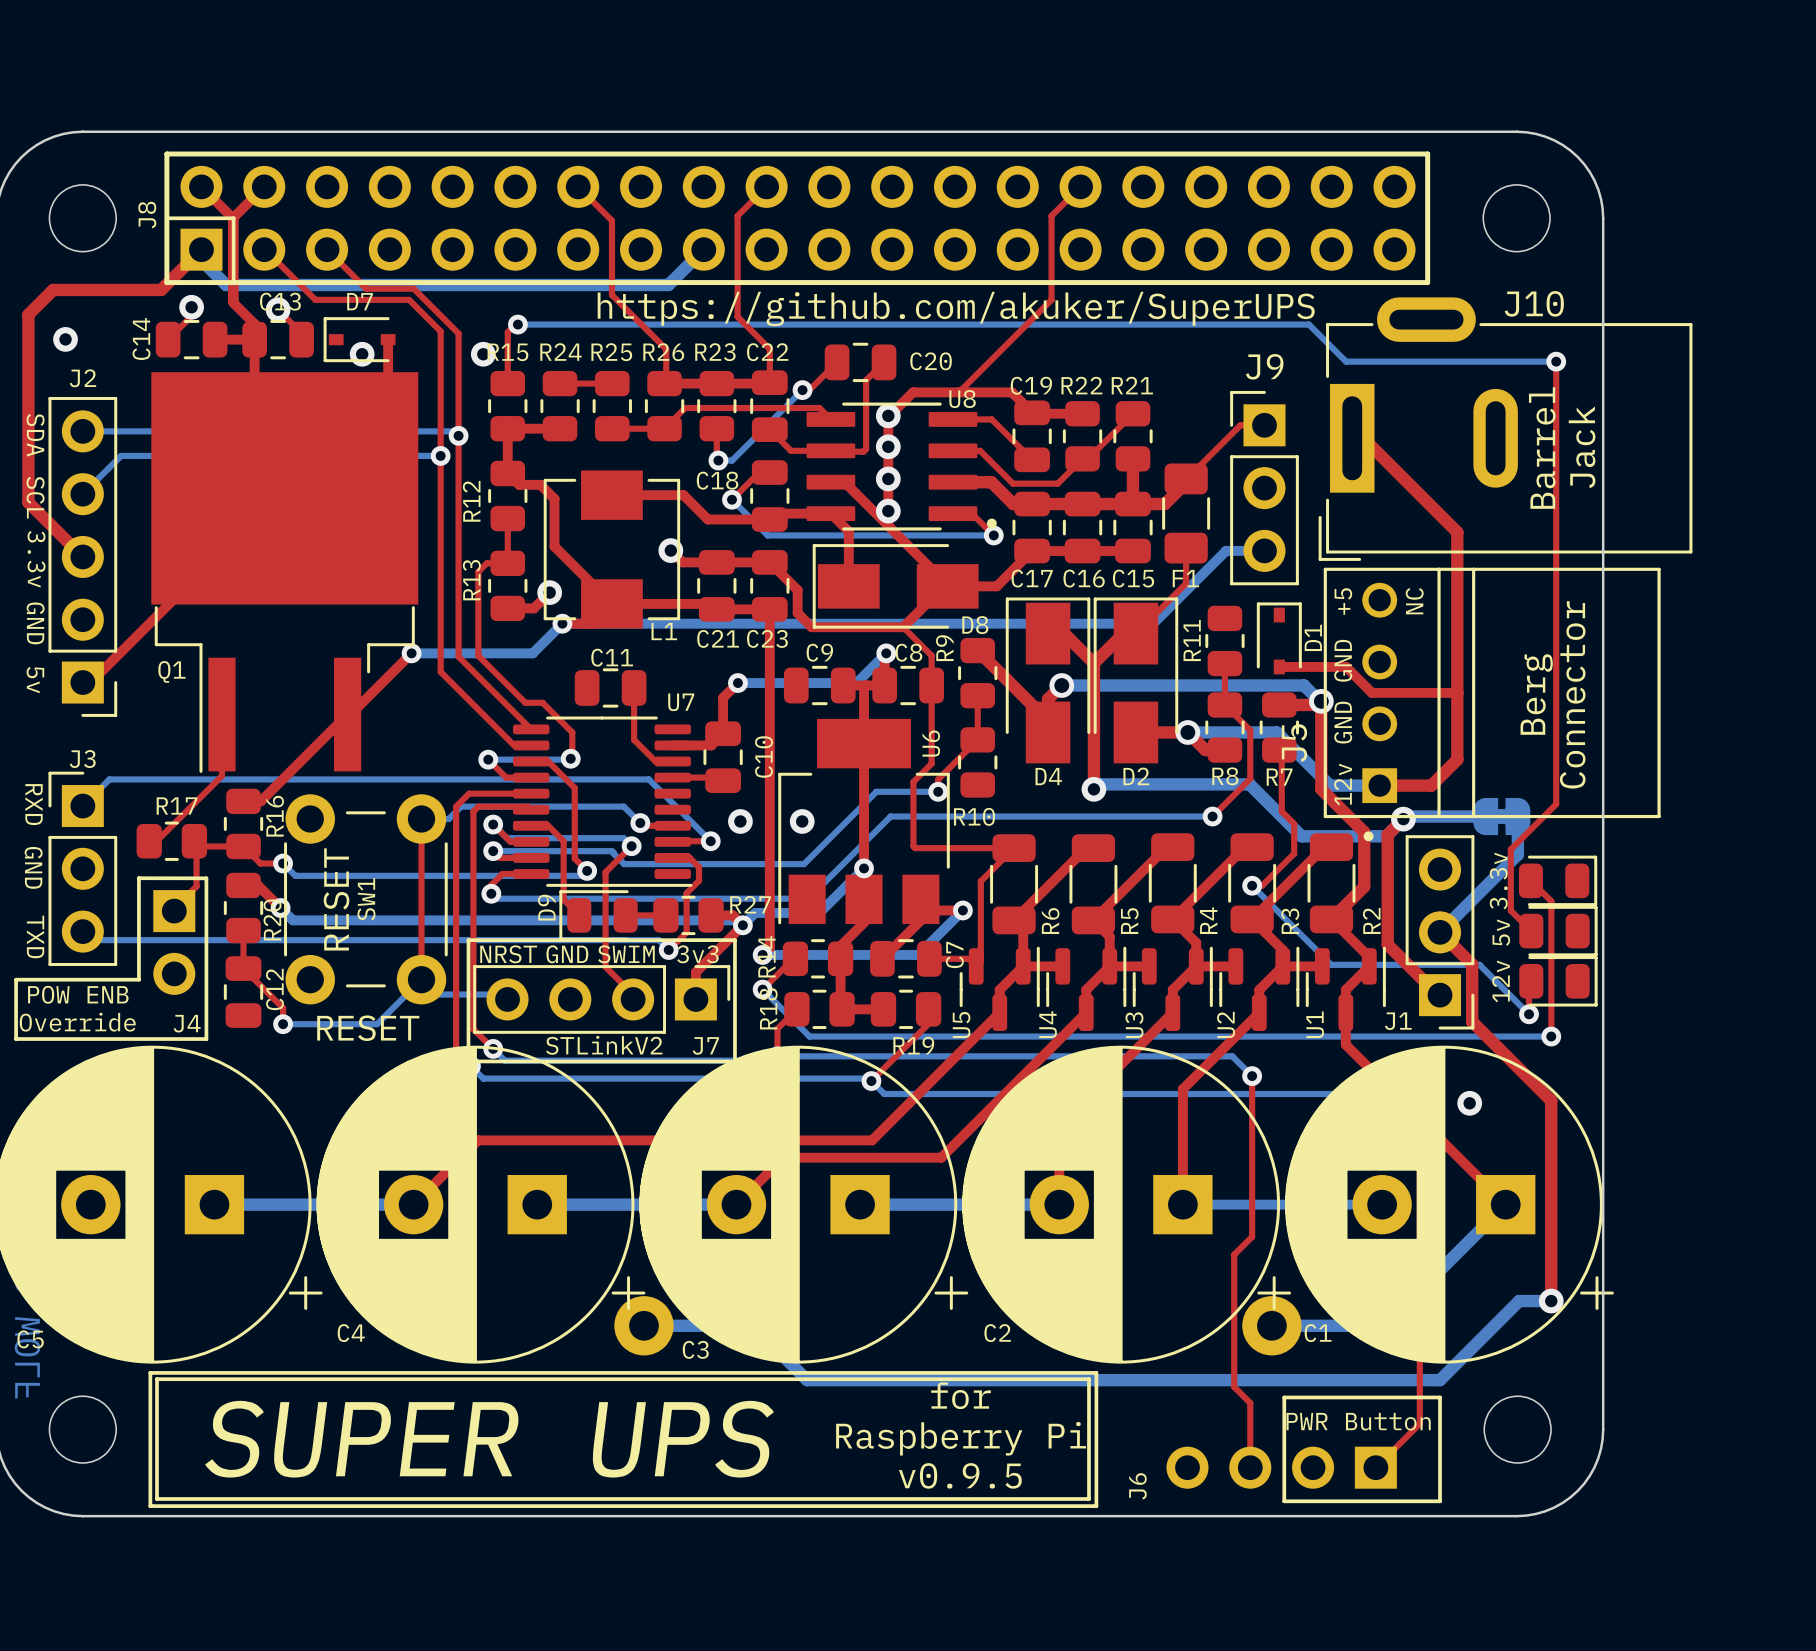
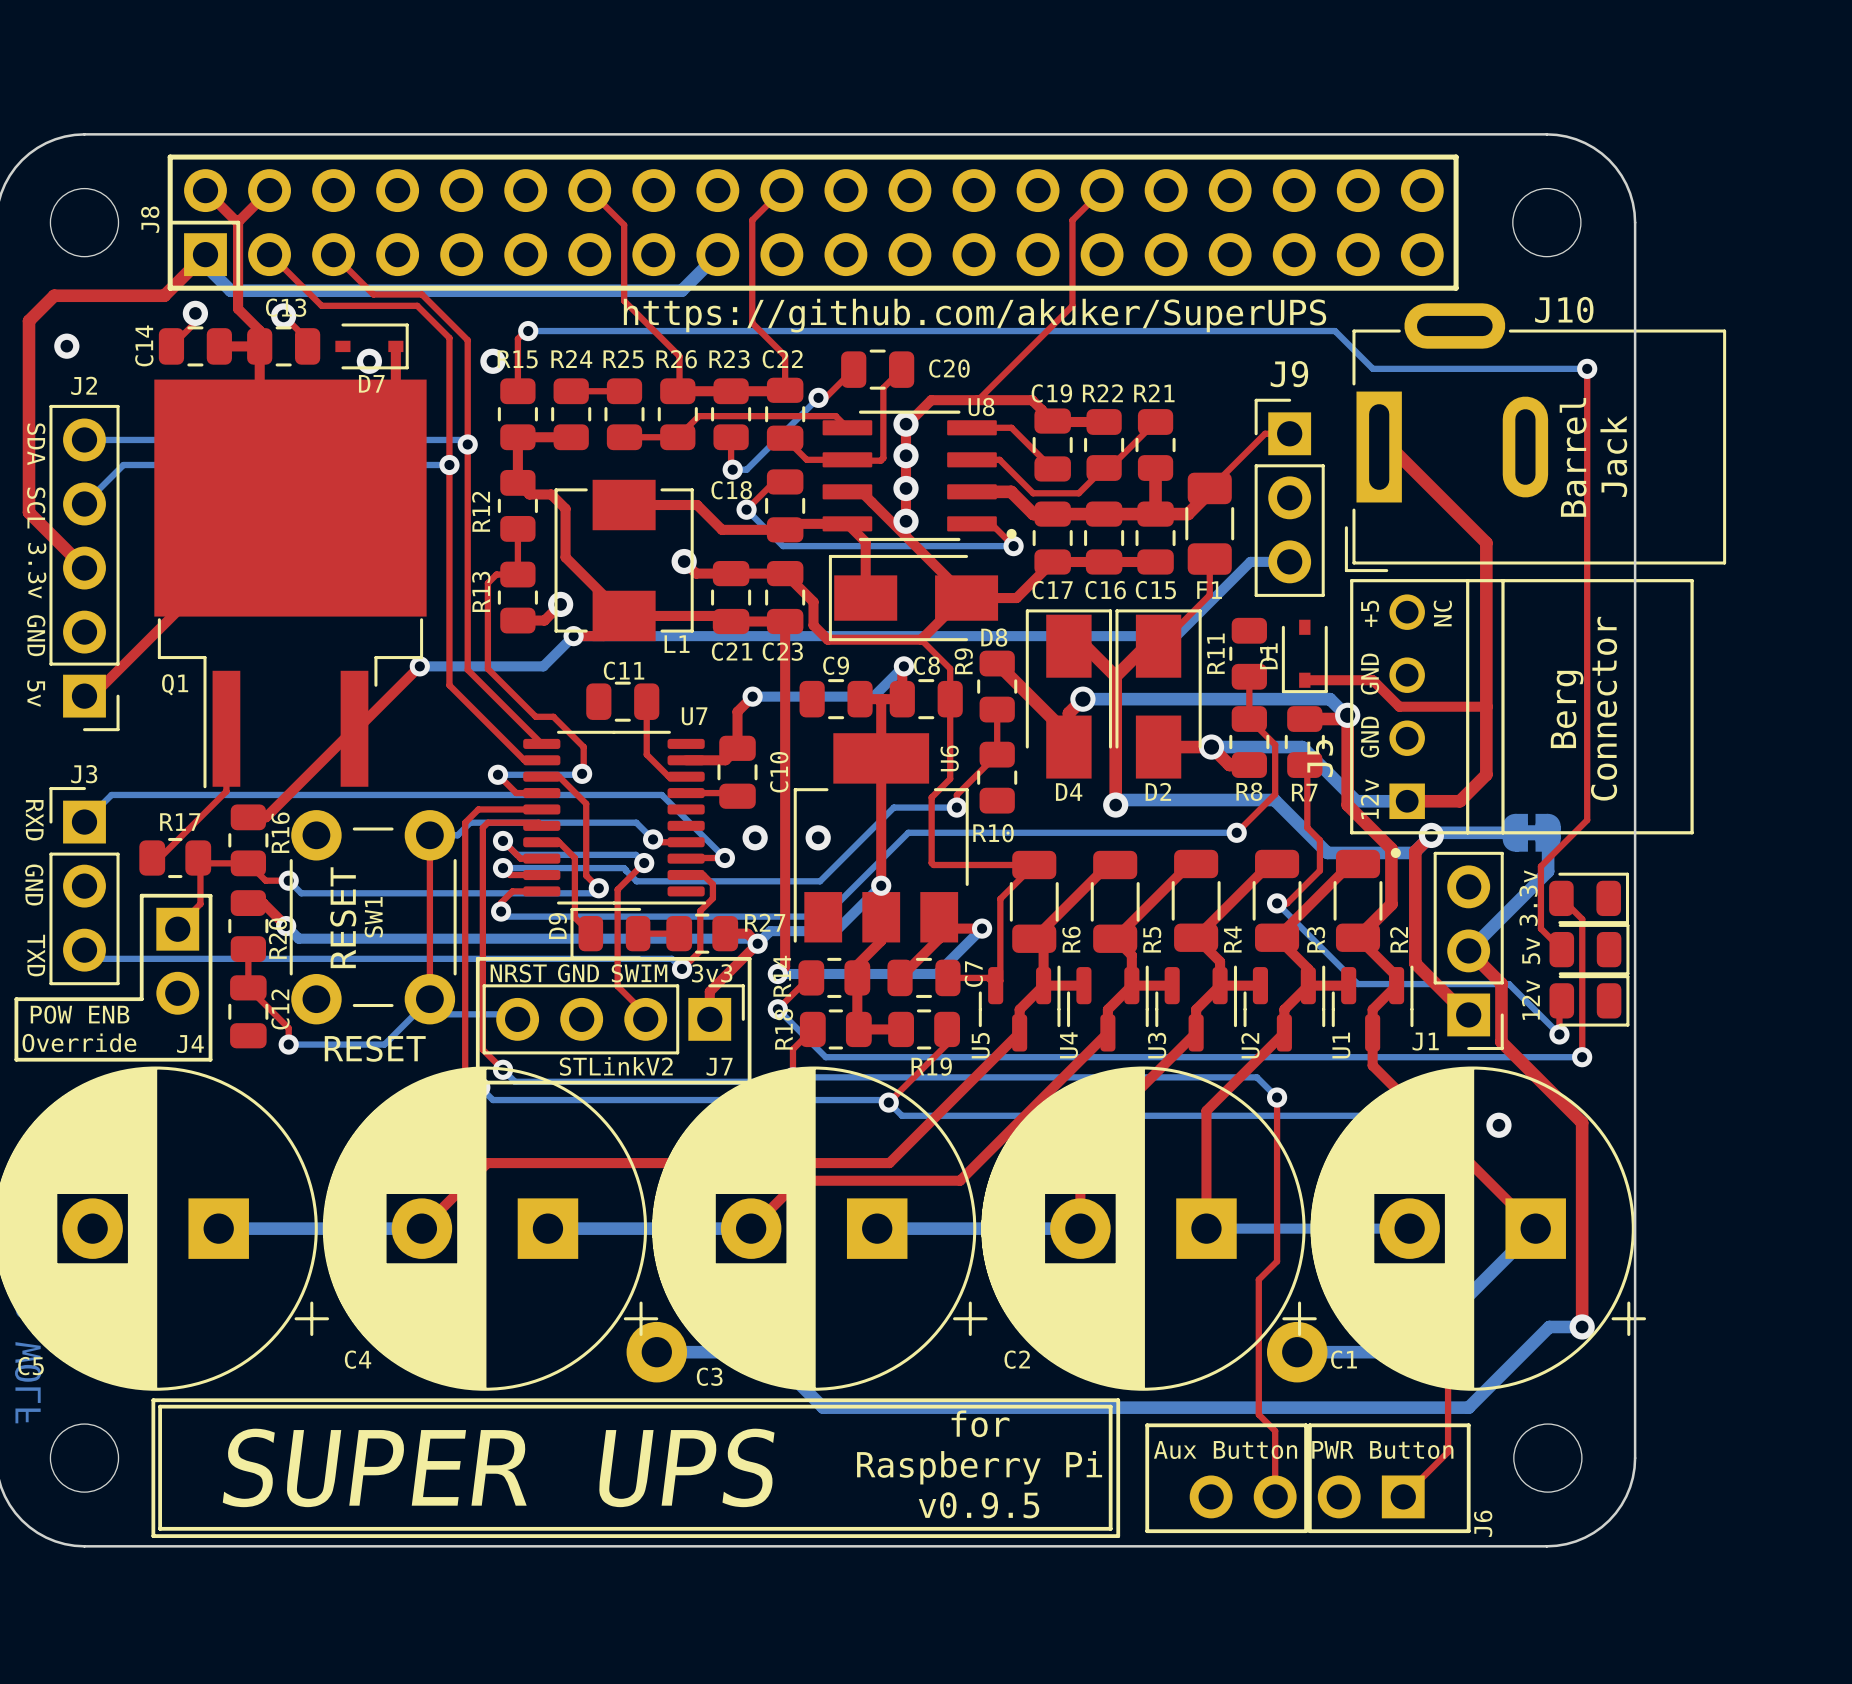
D7 rotation: 0° (359, 339) -> 180° (372, 346)
D1 rotation: 0° (1279, 638) -> 180° (1304, 656)
line: none -> (1147, 1425) (1306, 1425) (1306, 1531) (1147, 1531) (1147, 1425)
text: none -> Aux Button (1225, 1450)
J6 name position: J6 (1137, 1486) -> J6 (1483, 1523)

